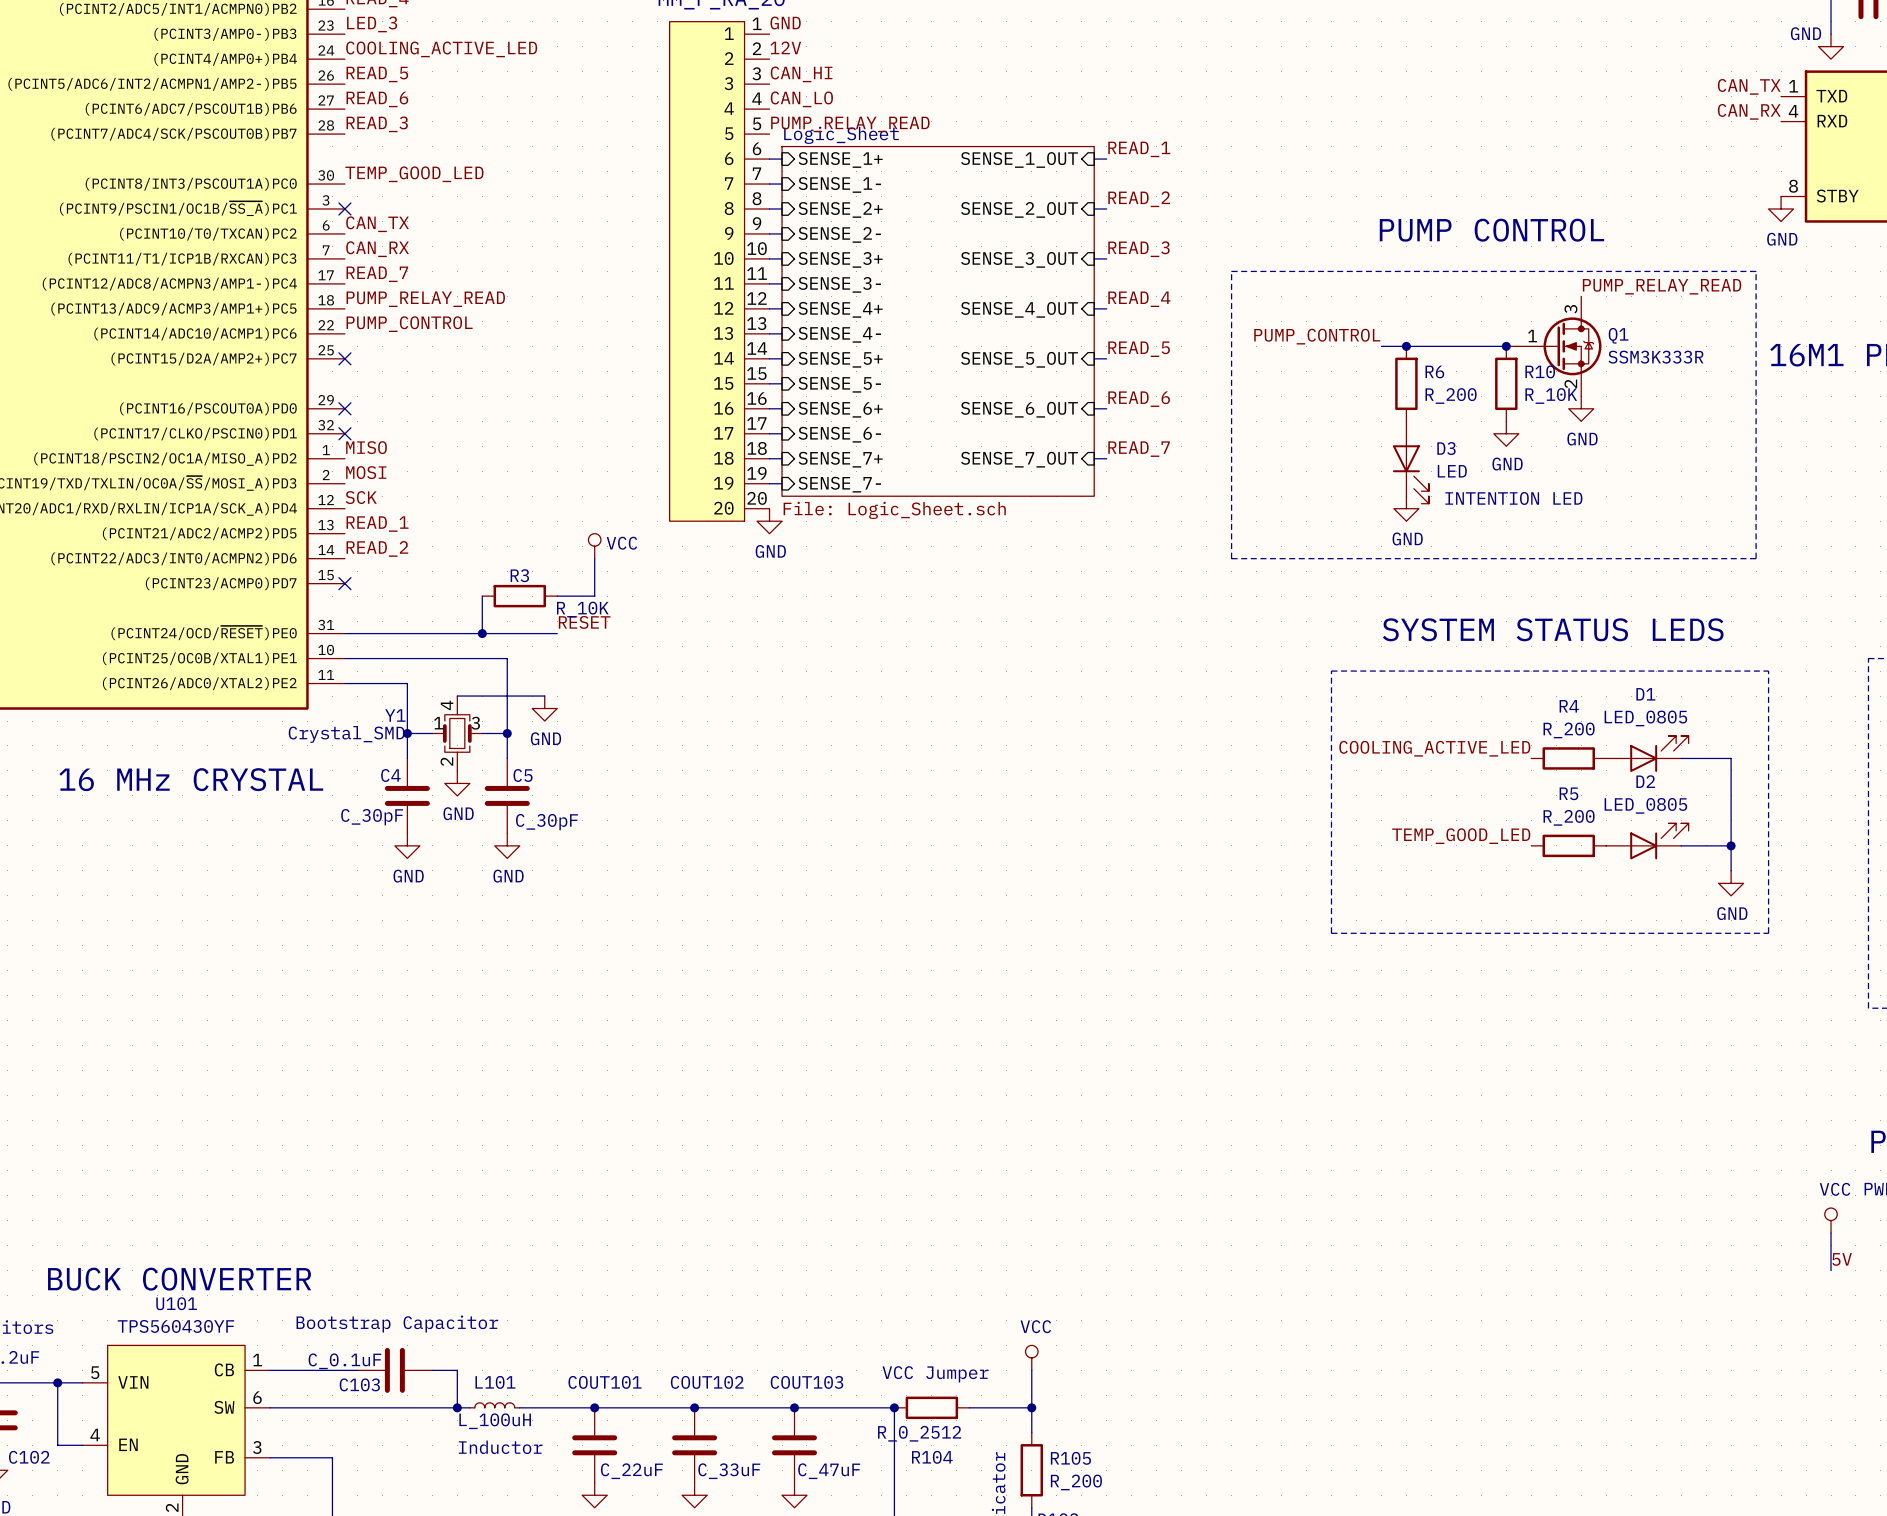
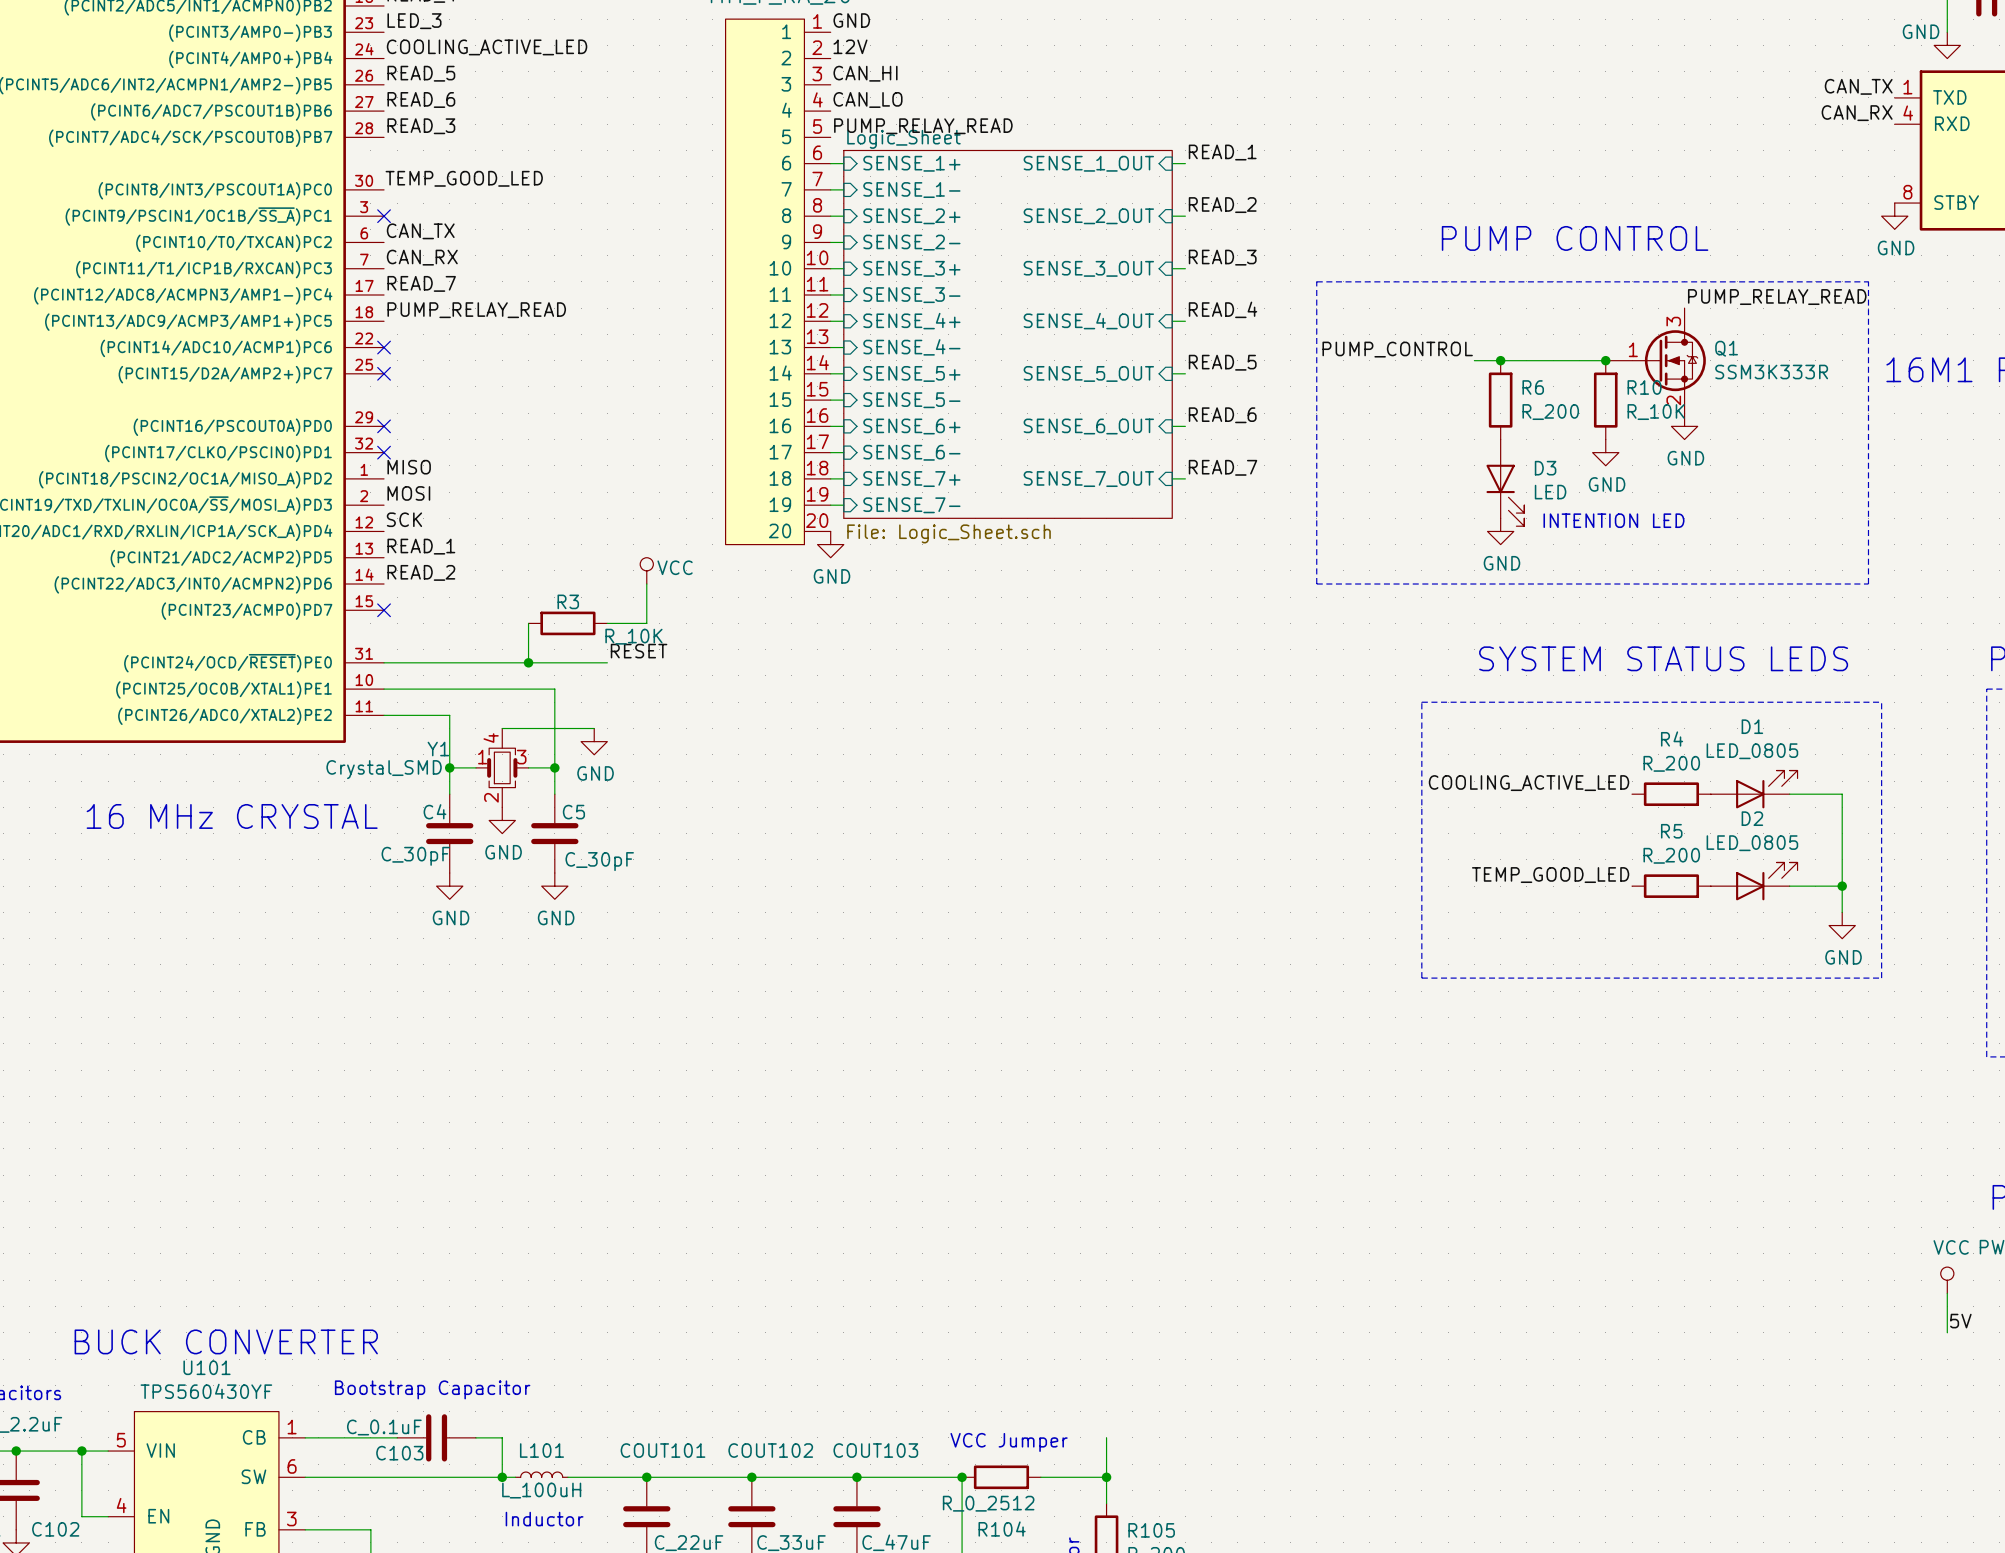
label: PUMP_CONTROL (409, 324) -> none
no-connect mark: none -> (384, 347)
power symbol: VCC (1031, 1357) -> none

